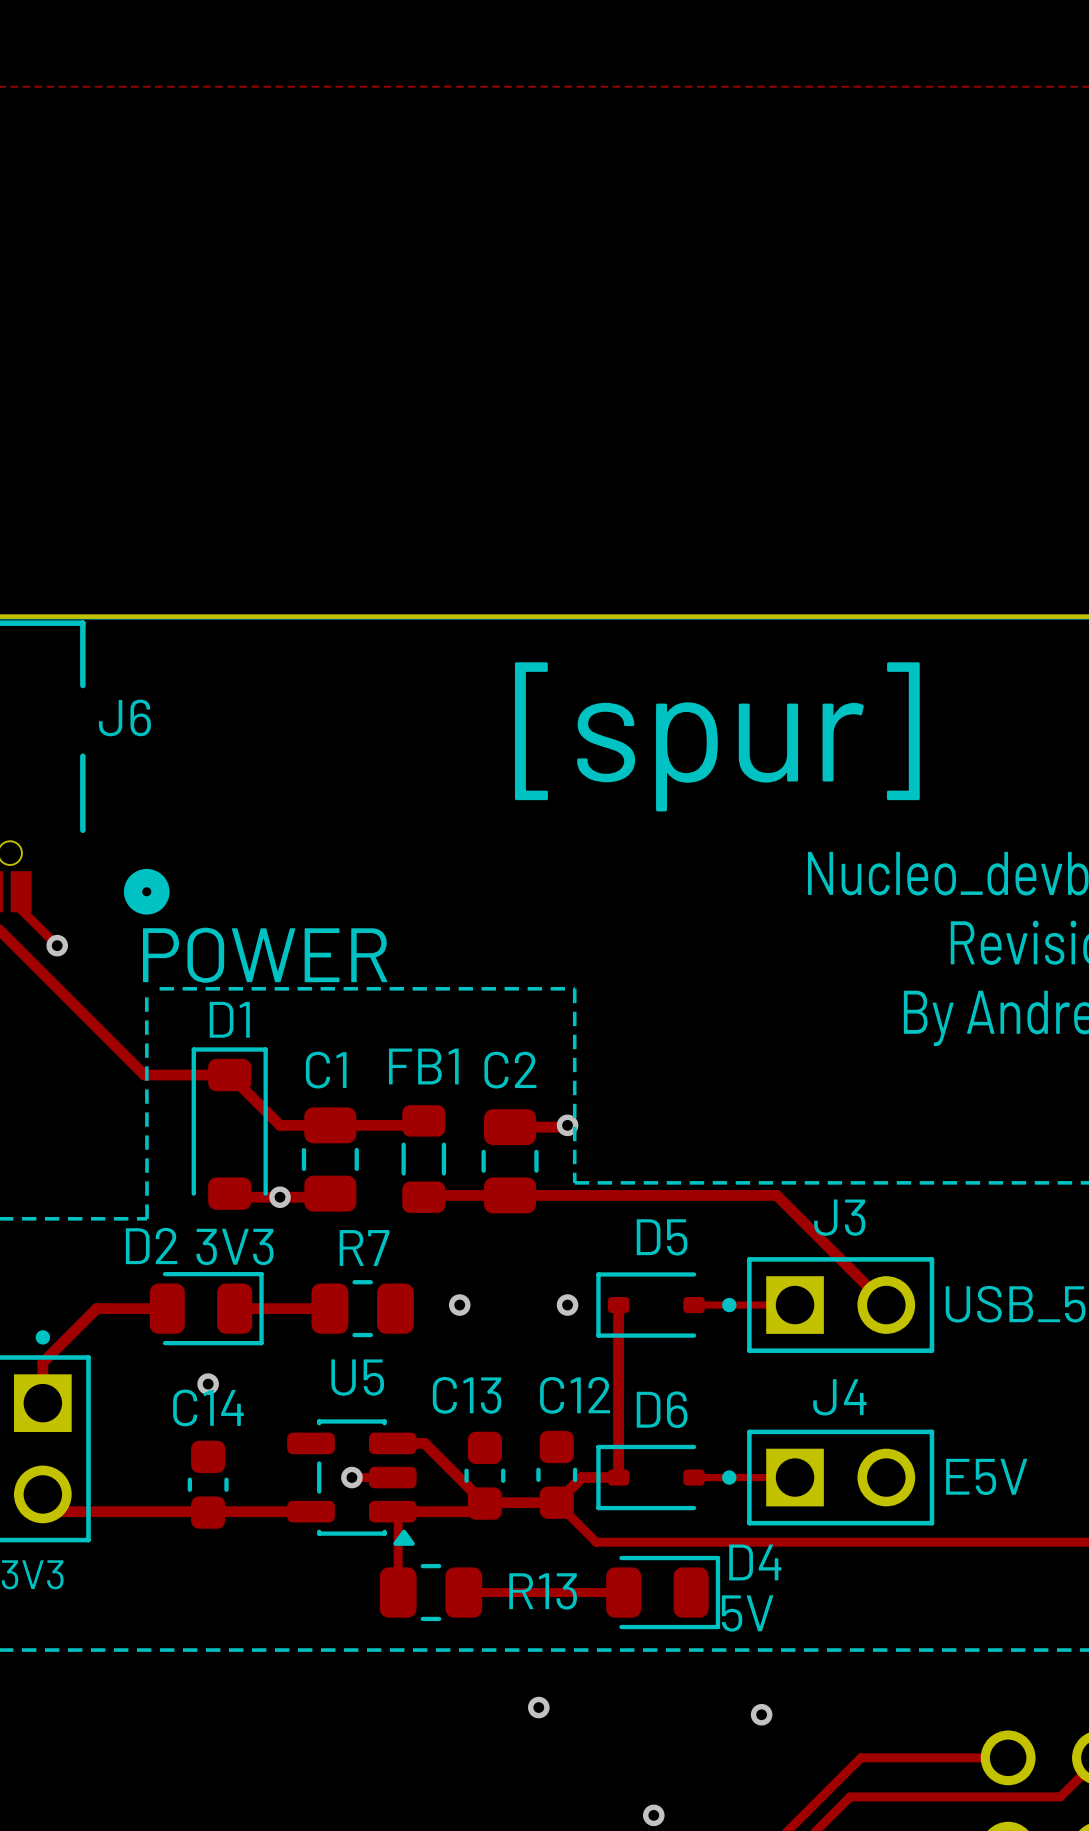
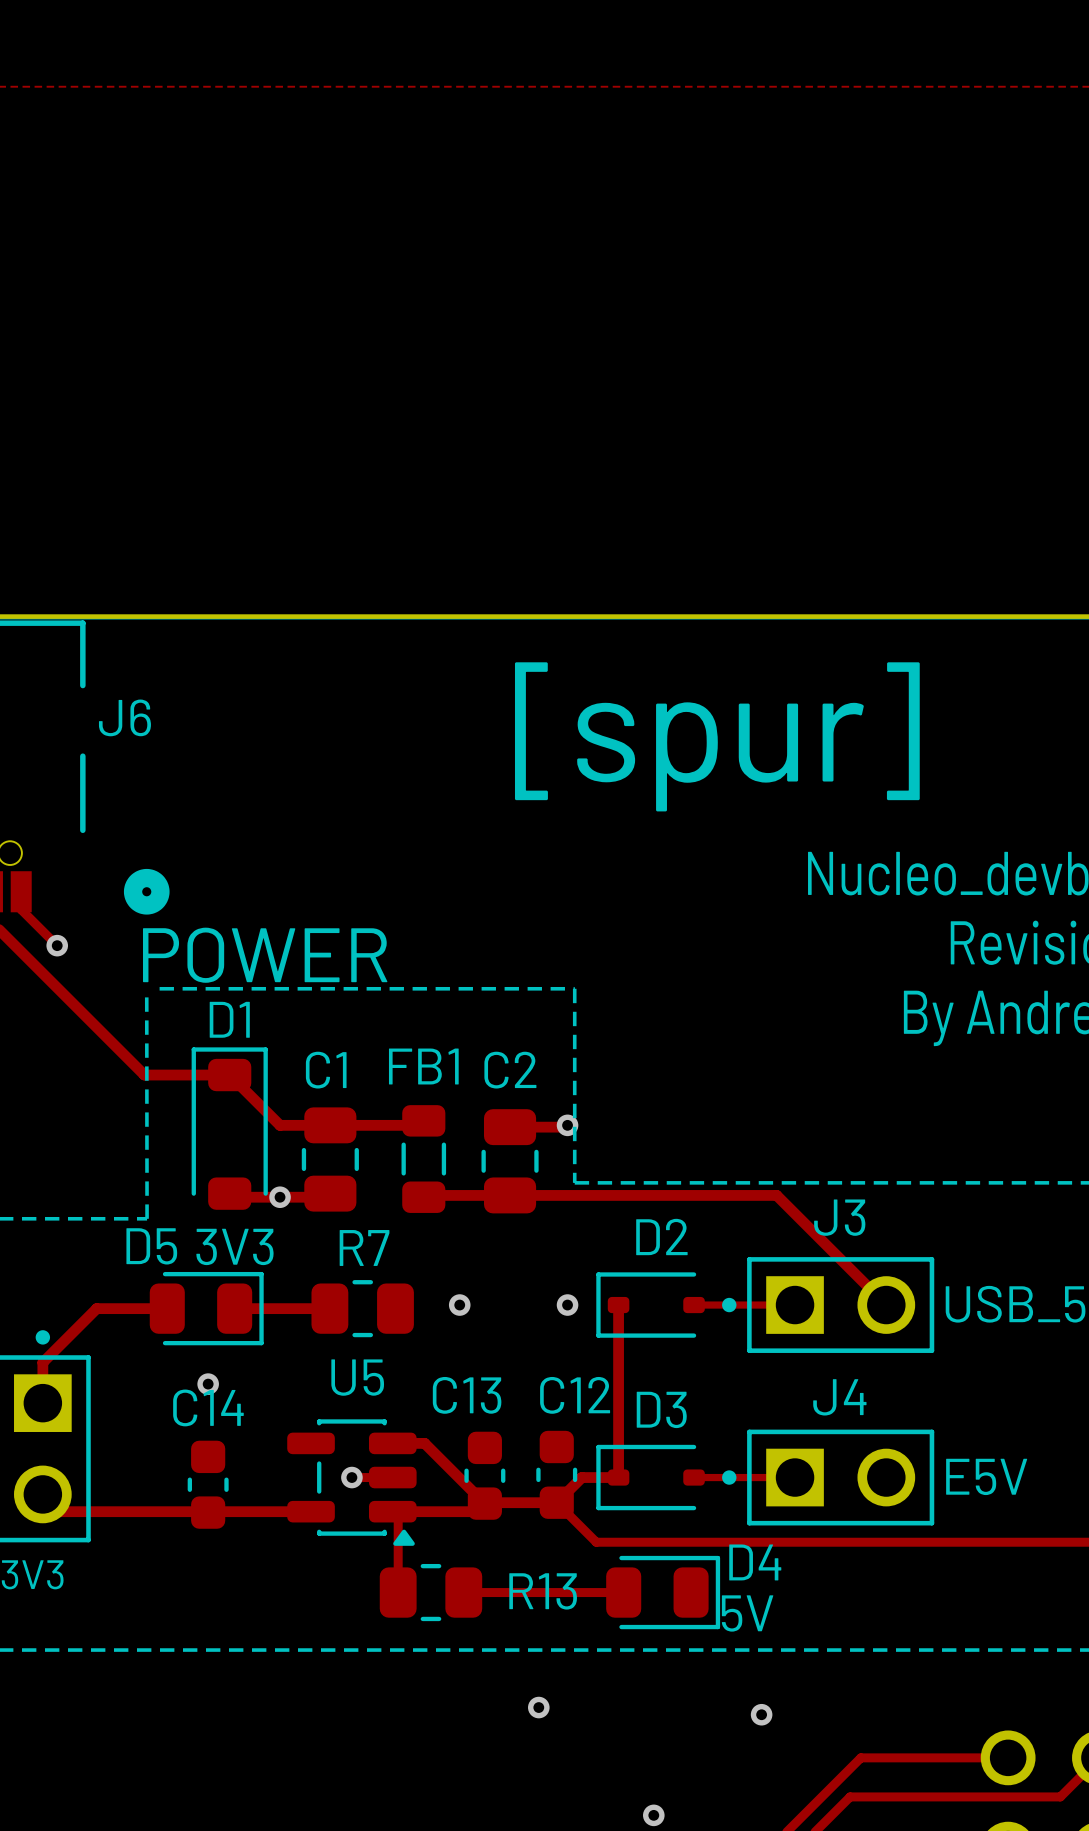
D5 name: D5 (662, 1237) -> D2 (661, 1237)
D2 name: D2 (151, 1245) -> D5 (151, 1246)
D6 name: D6 (662, 1409) -> D3 (661, 1409)

